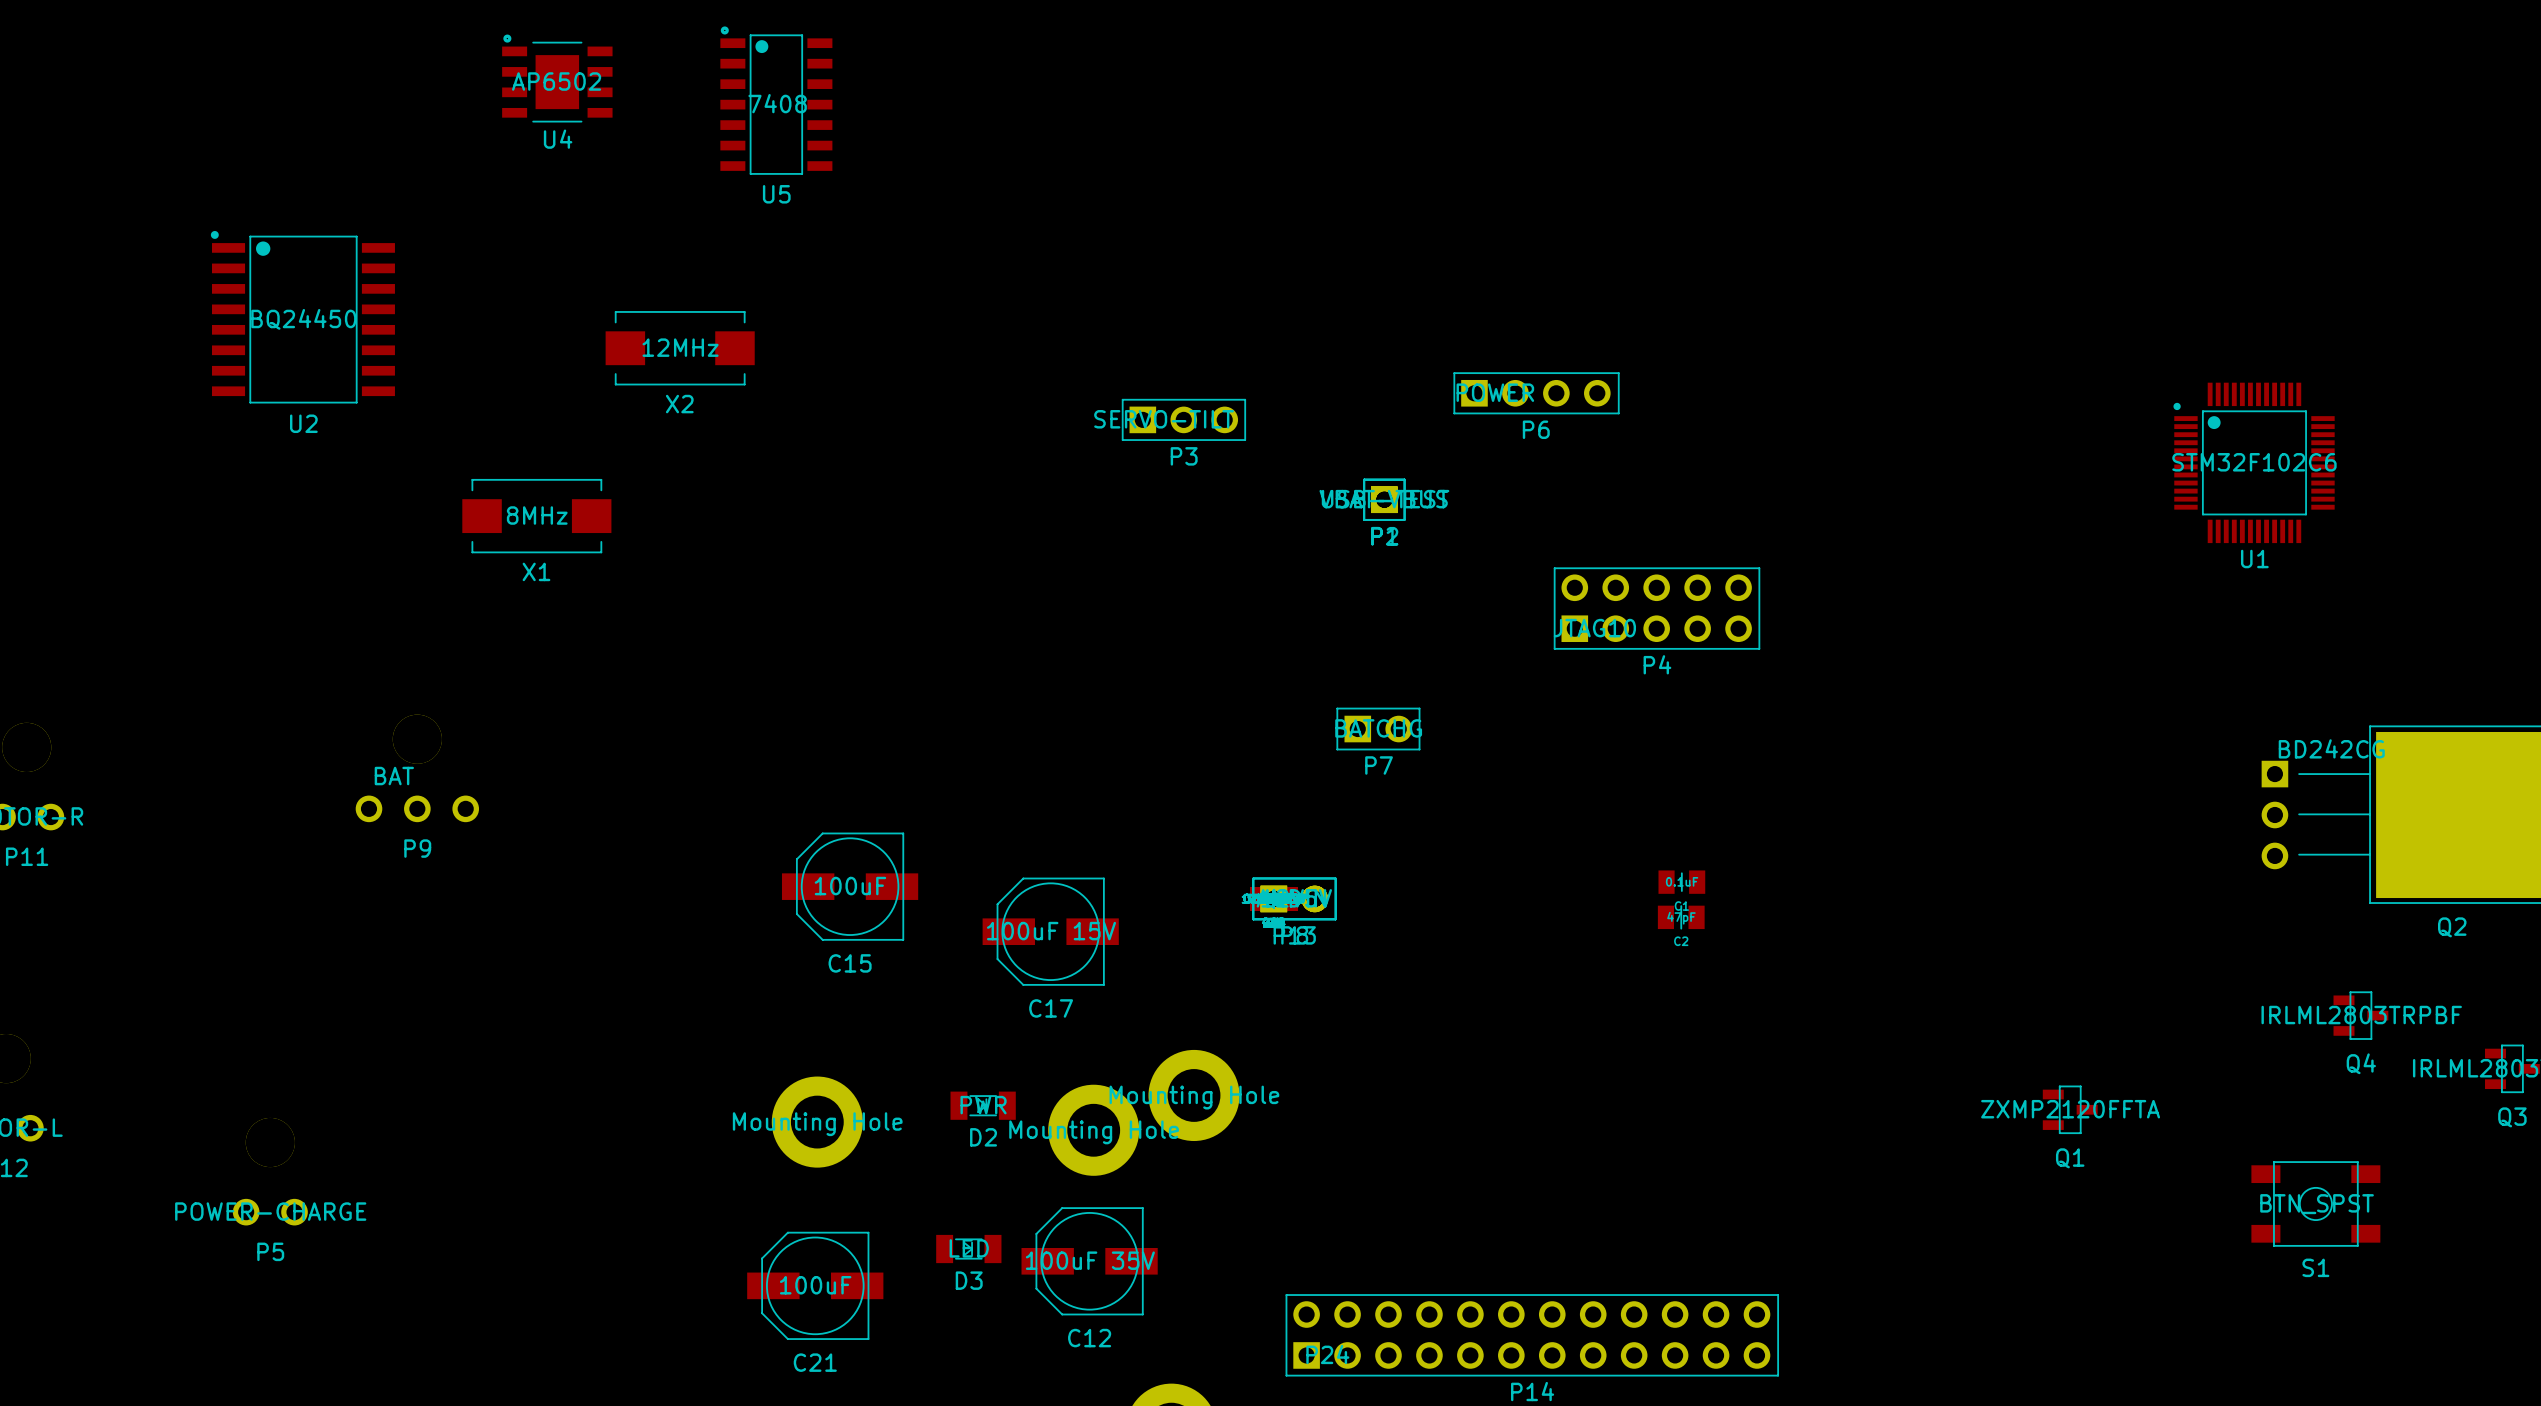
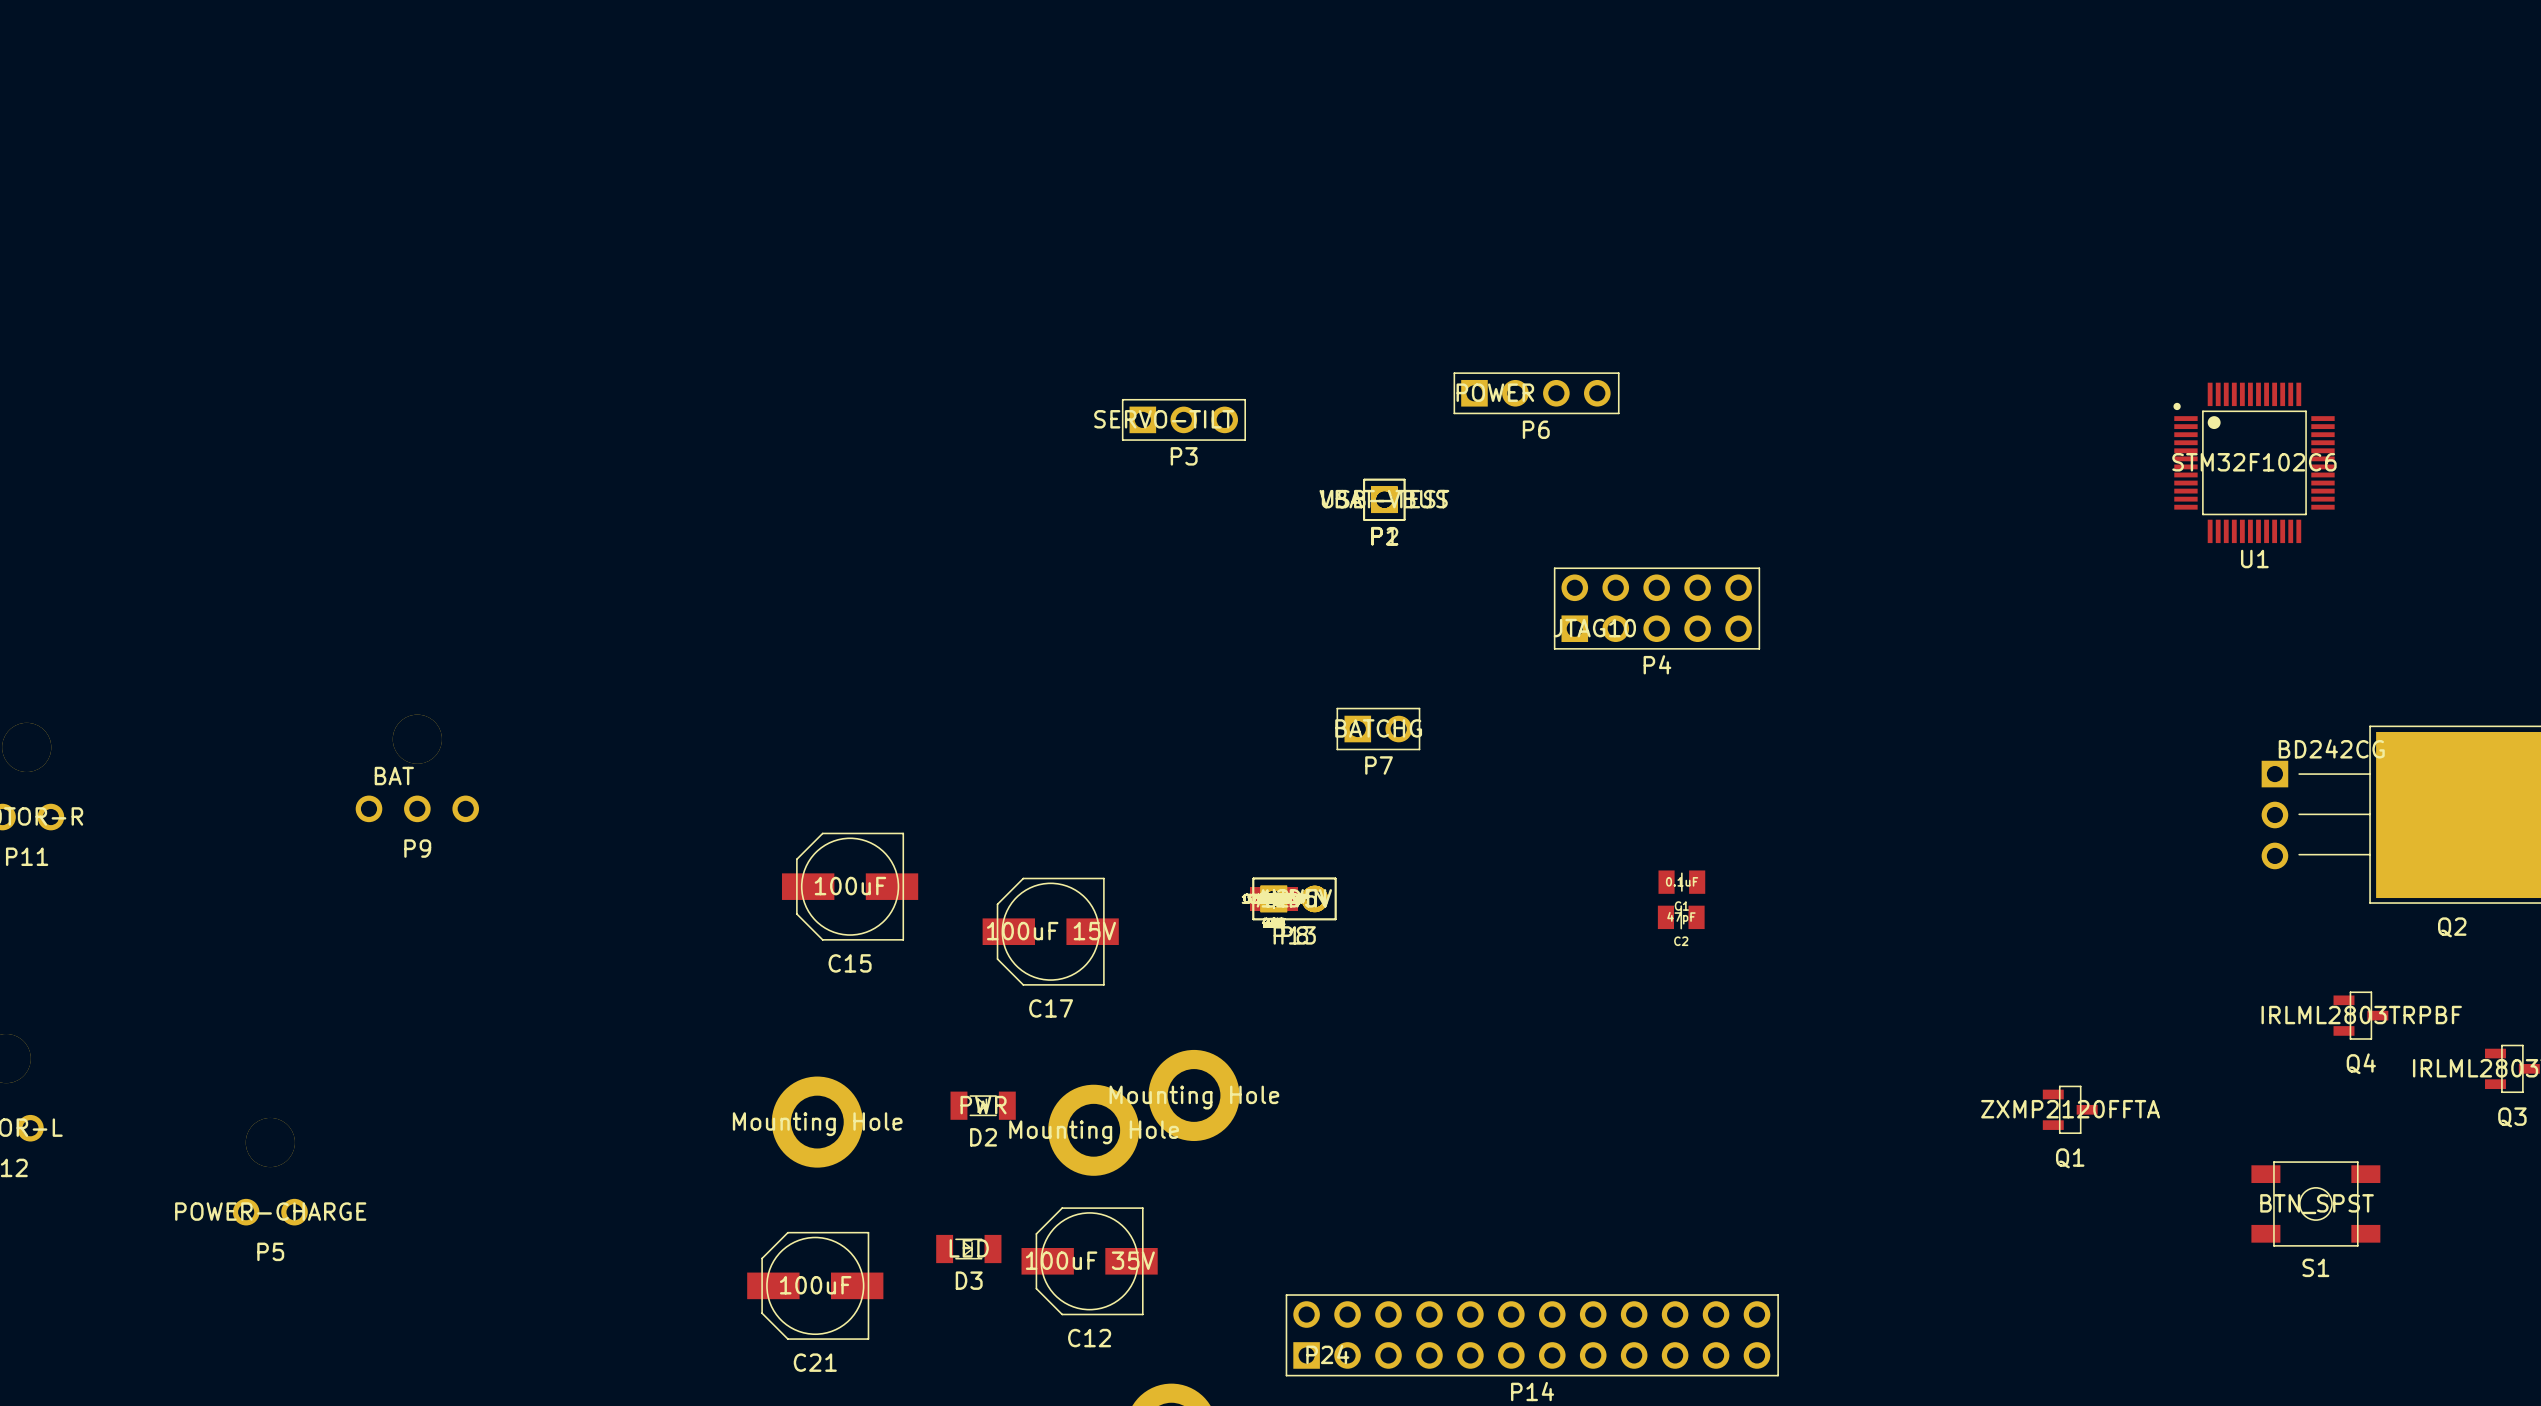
U4: AP6502 (557, 78) -> none
U5: 7408 (776, 100) -> none
U2: BQ24450 (302, 317) -> none
X2: 12MHz (680, 348) -> none
X1: 8MHz (536, 516) -> none

